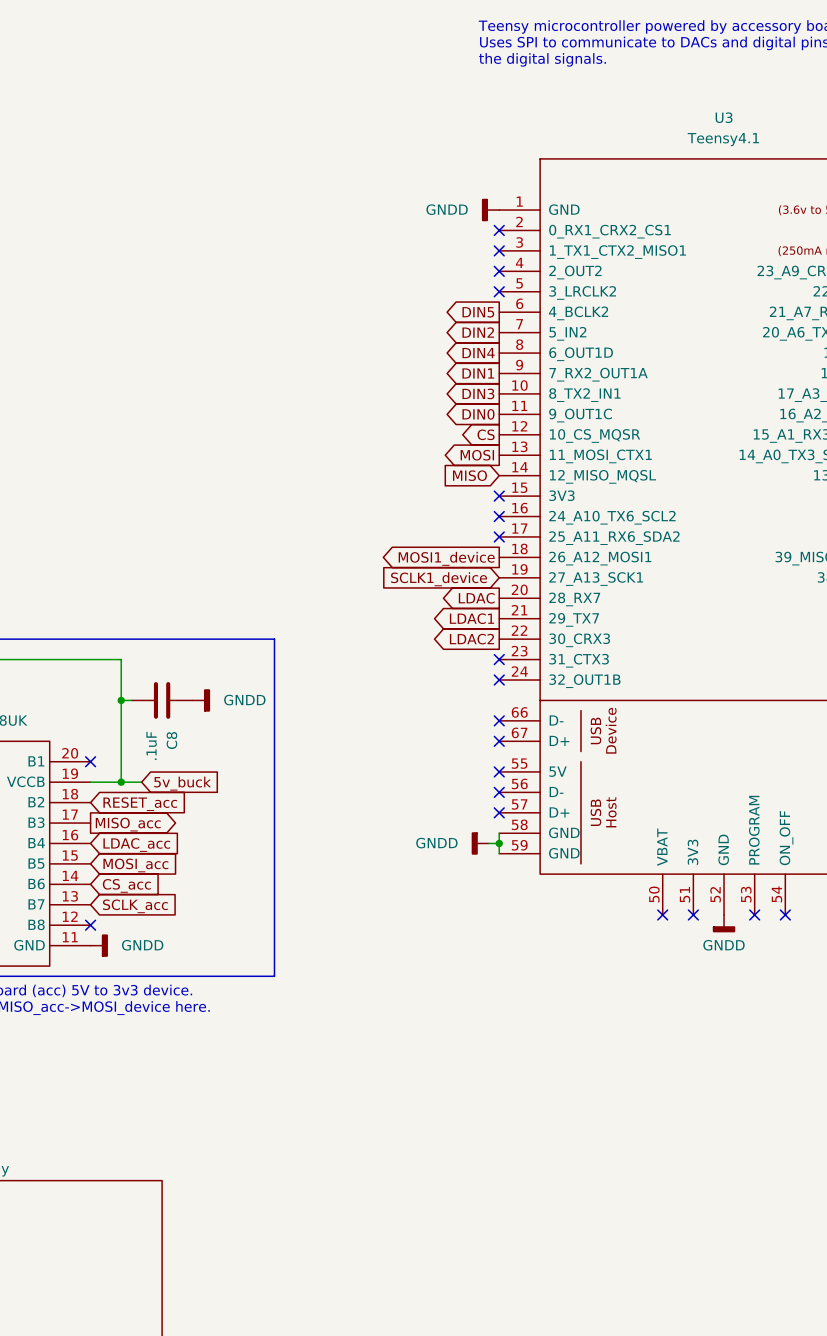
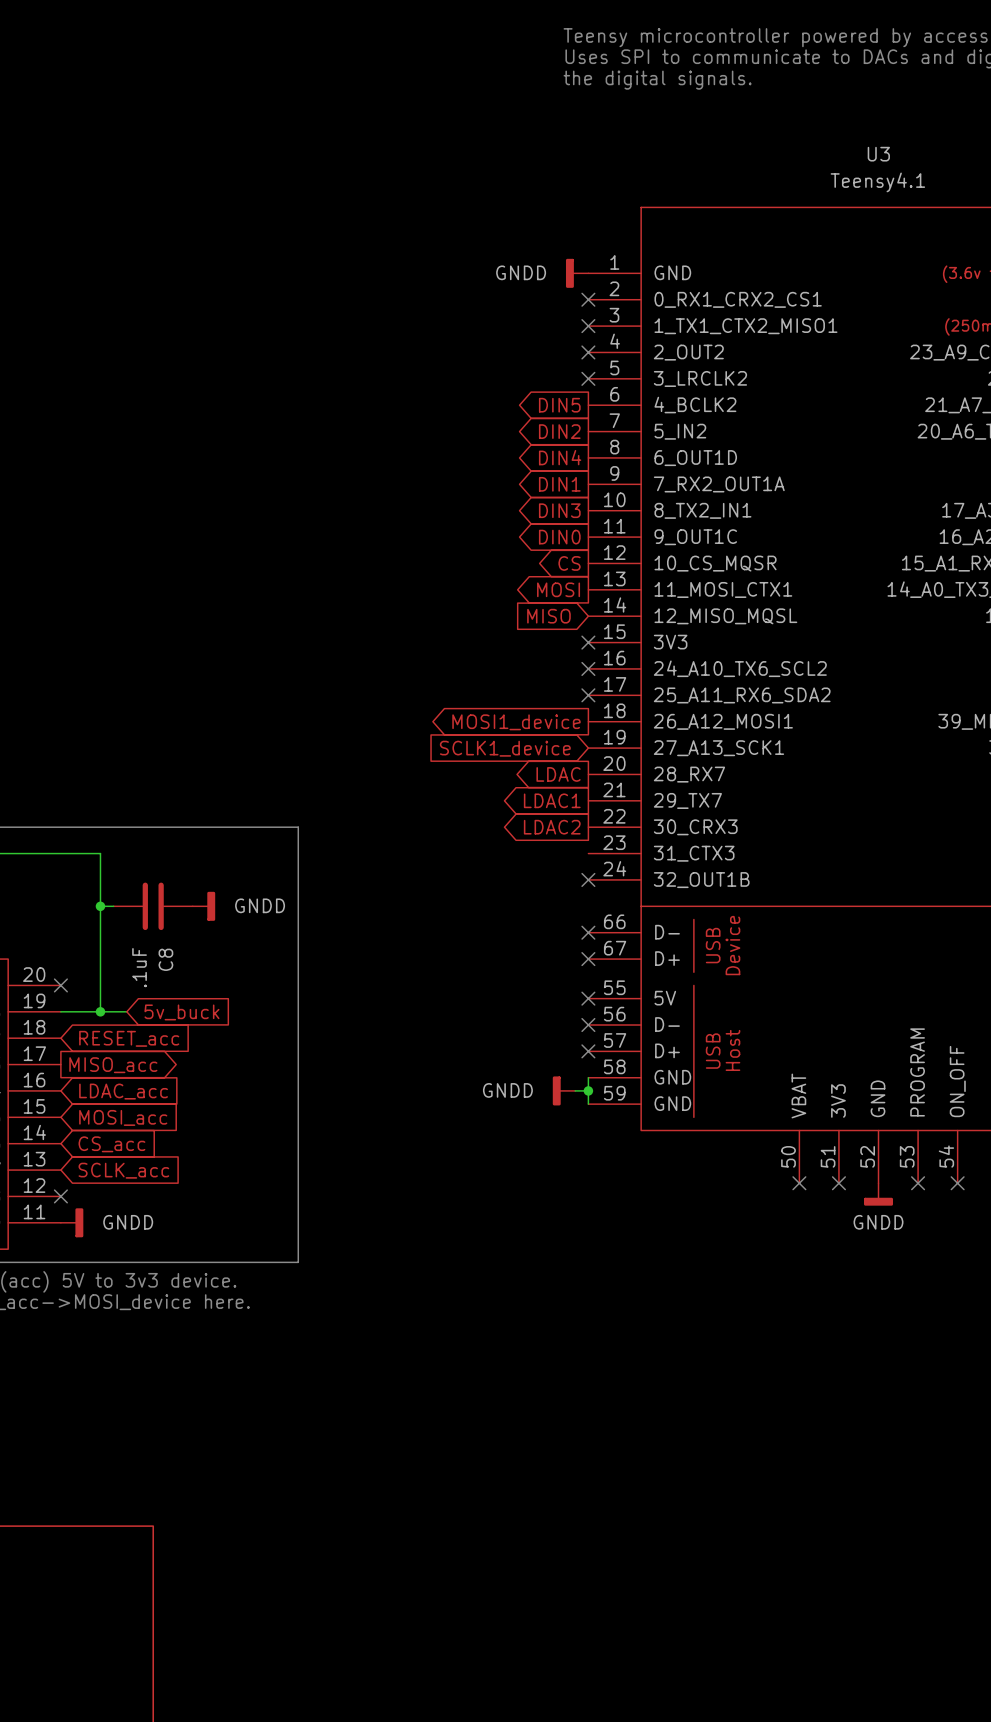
no-connect mark: (499, 659) -> none

